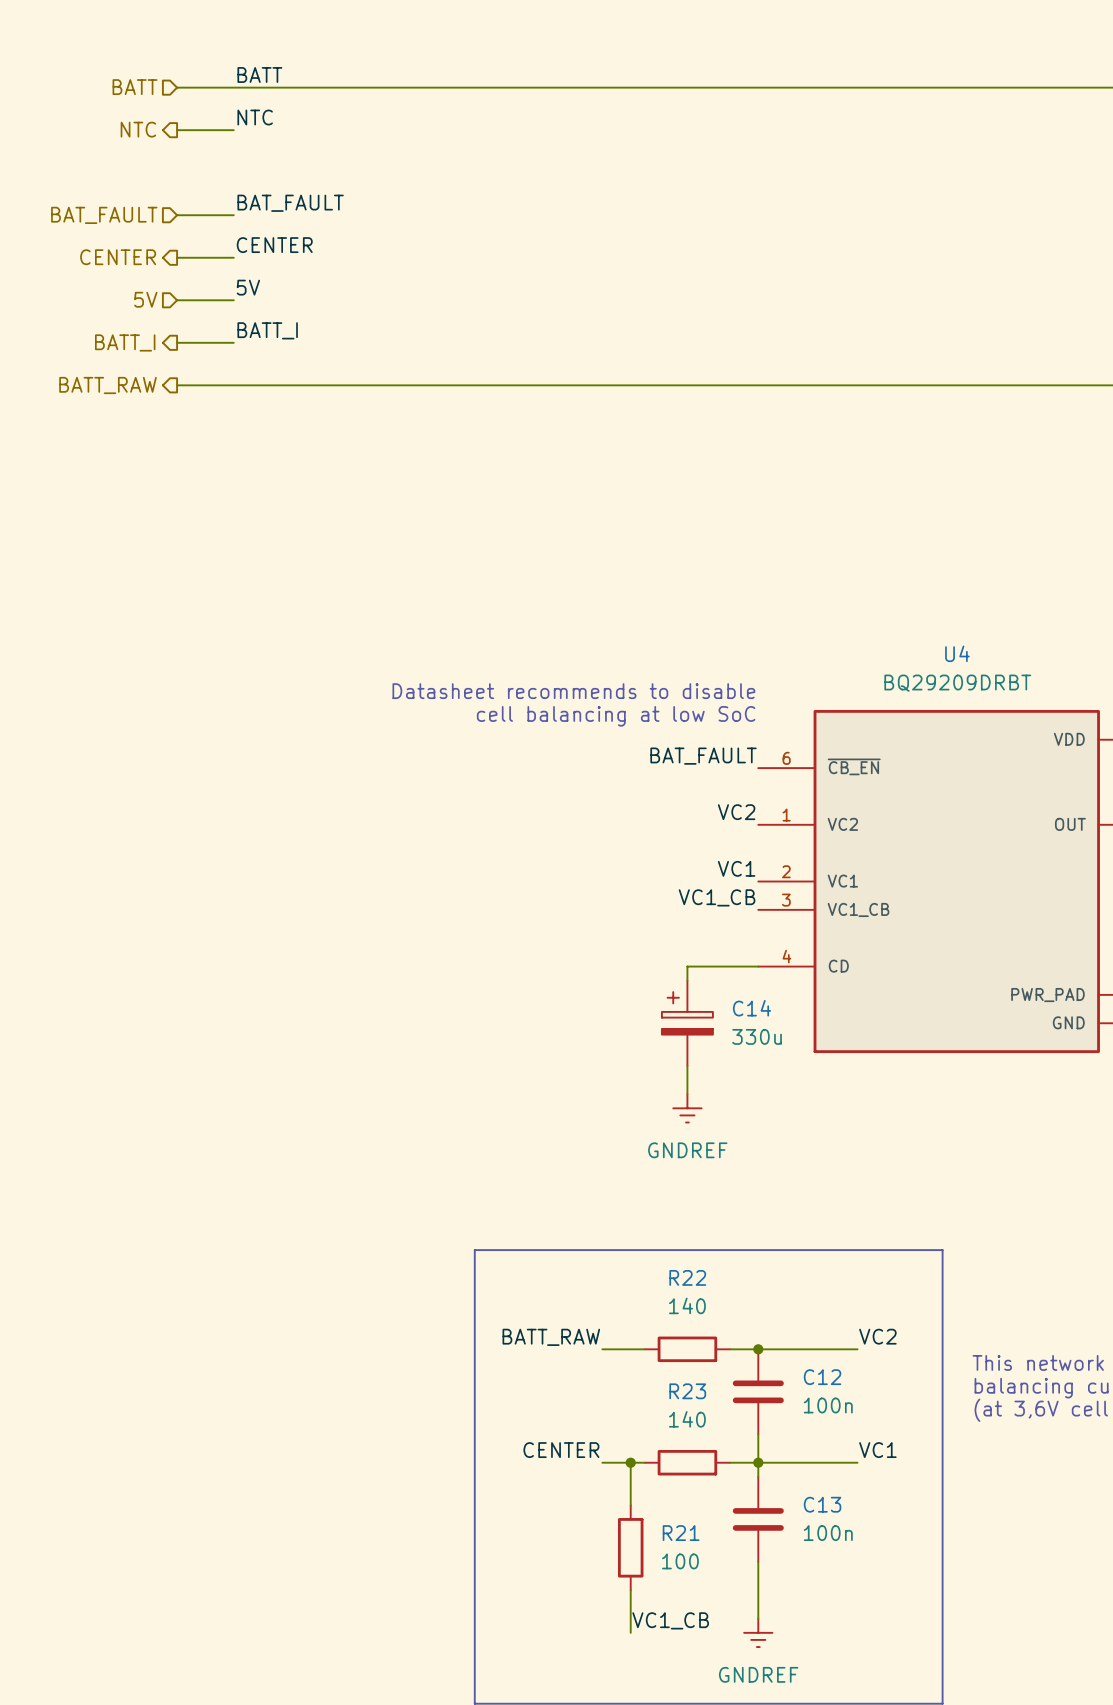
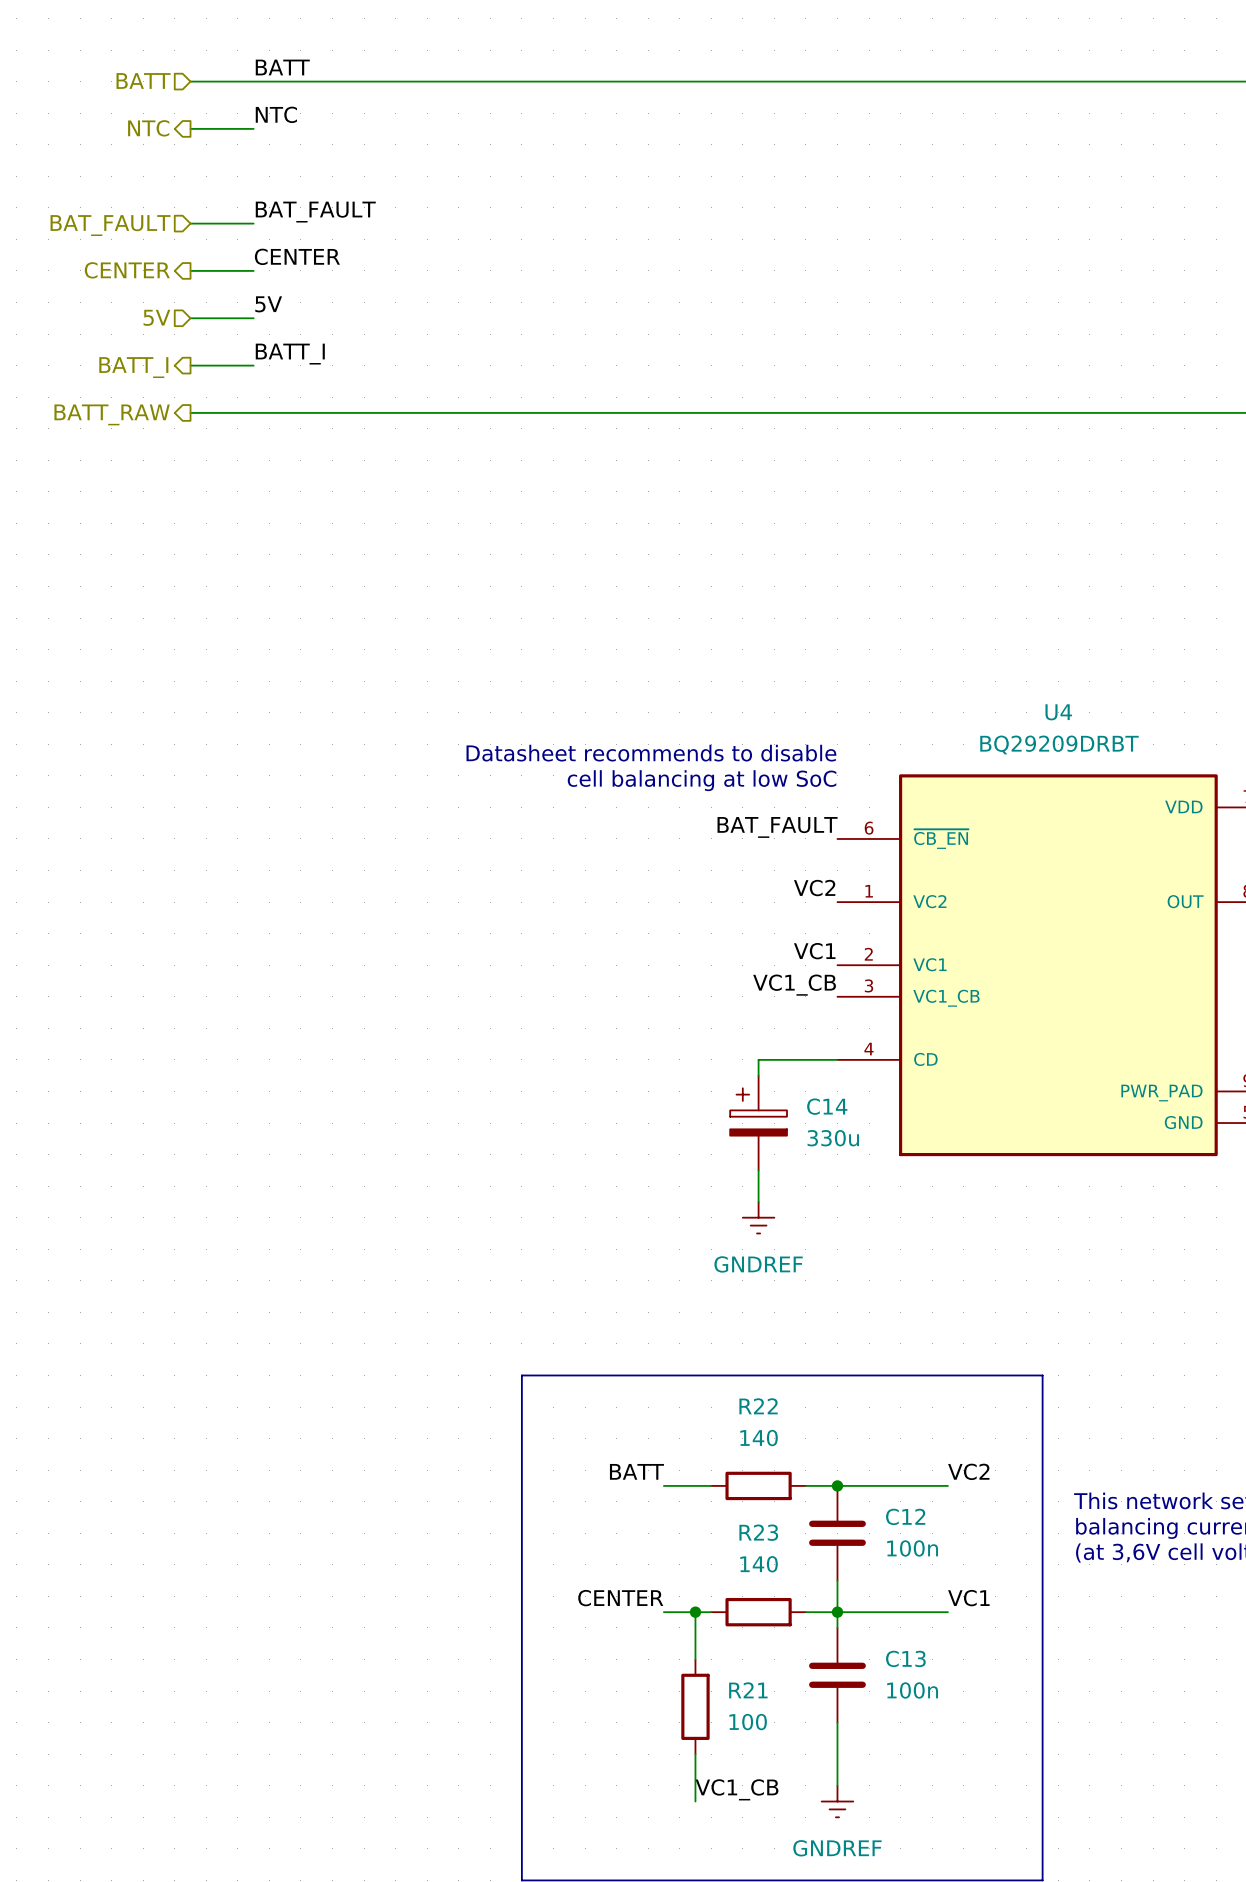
label: BATT_RAW (551, 1337) -> BATT (636, 1471)

